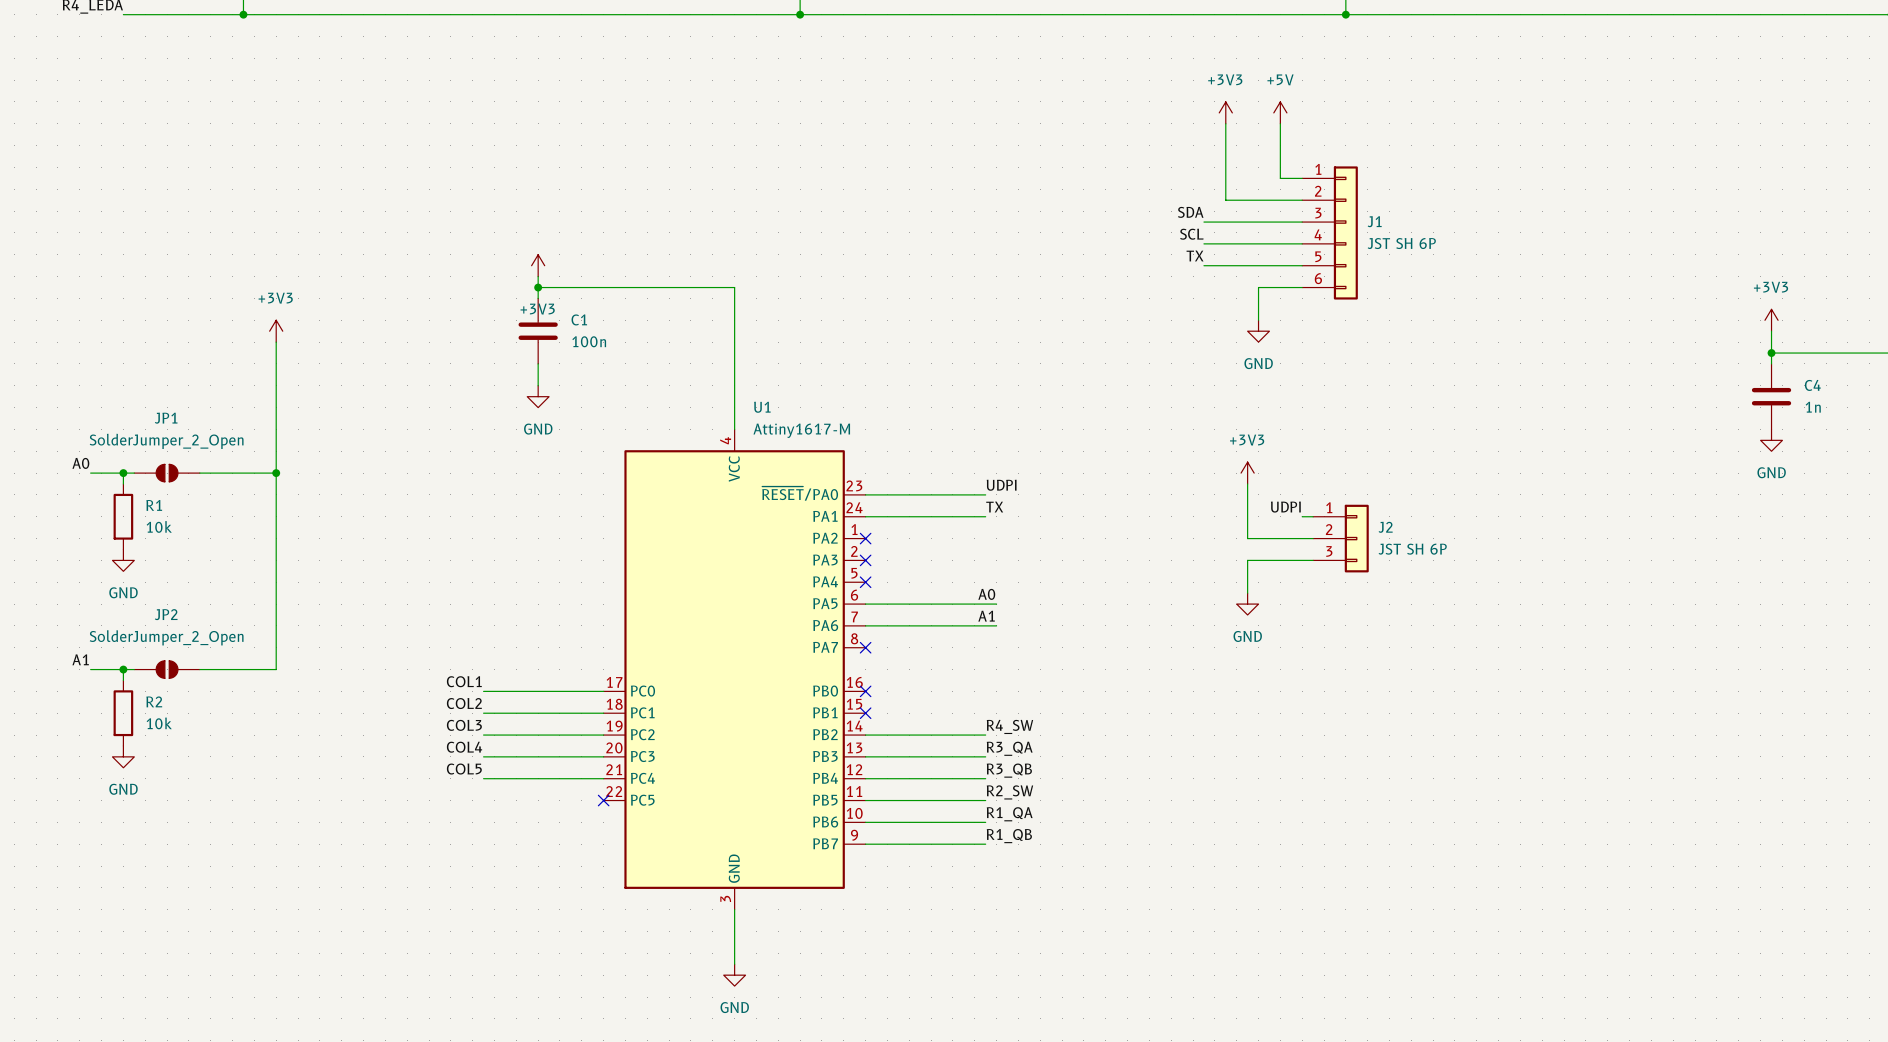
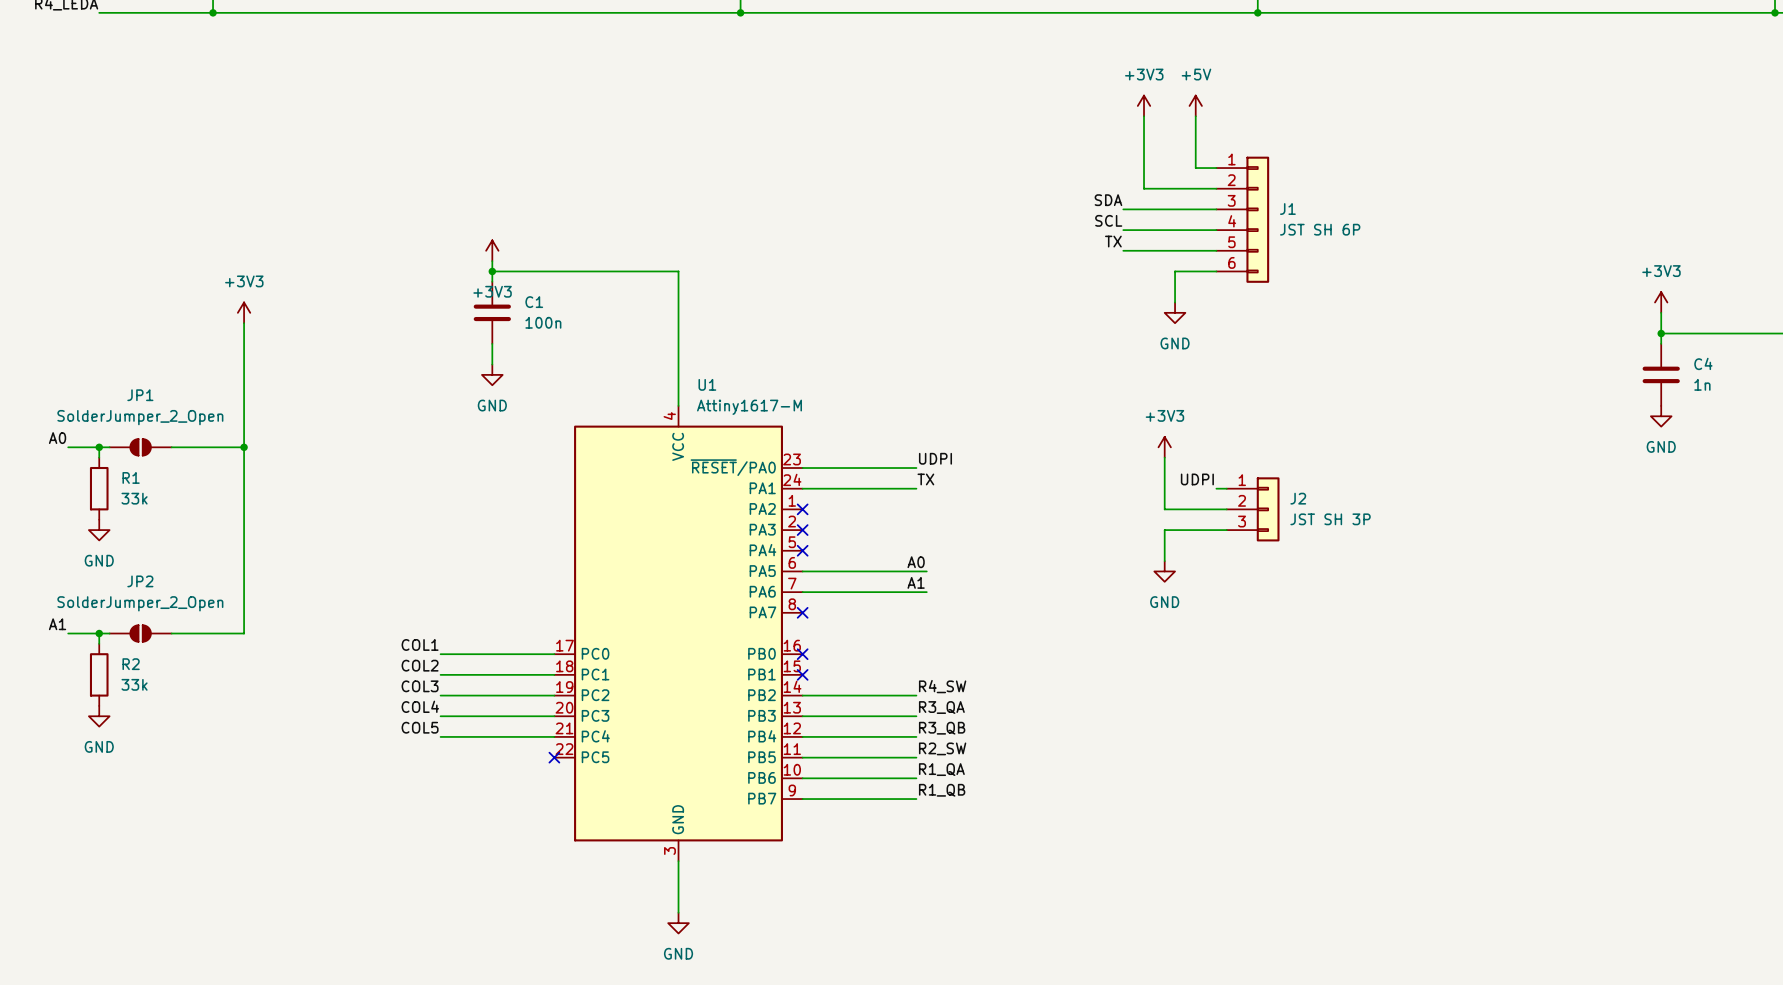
R1 value: 10k (159, 526) -> 33k (134, 498)
J2 value: JST SH 6P (1412, 549) -> JST SH 3P (1330, 519)
R2 value: 10k (159, 723) -> 33k (134, 684)

